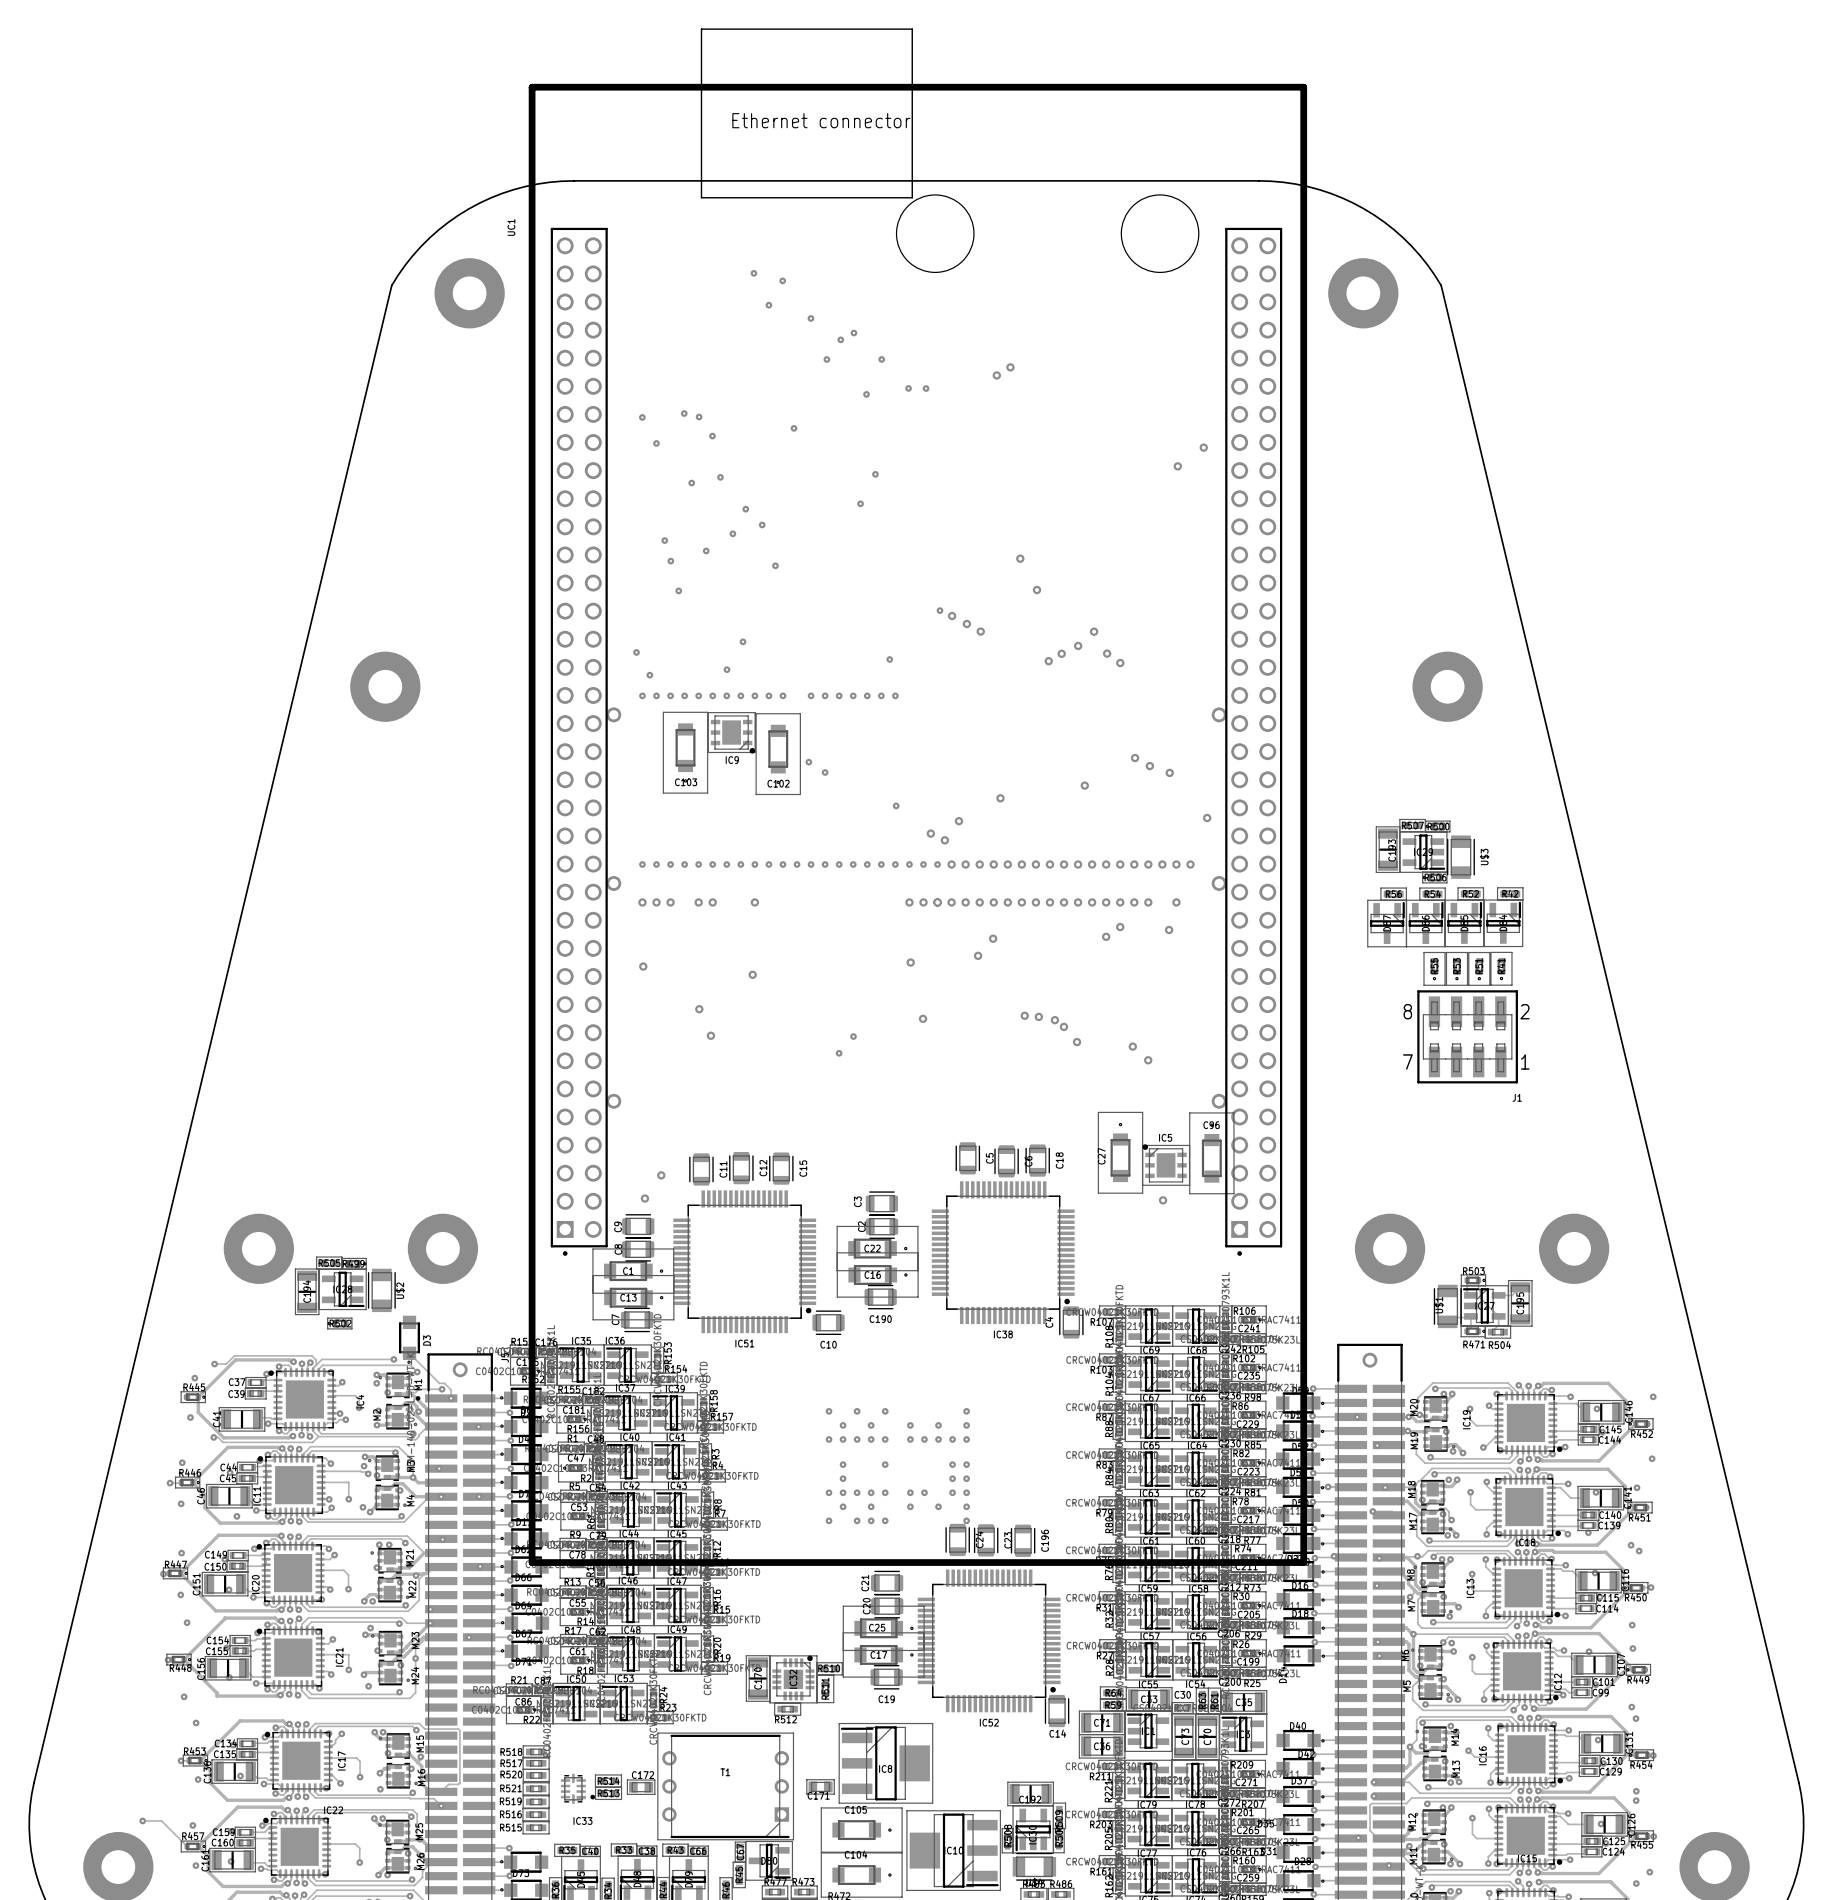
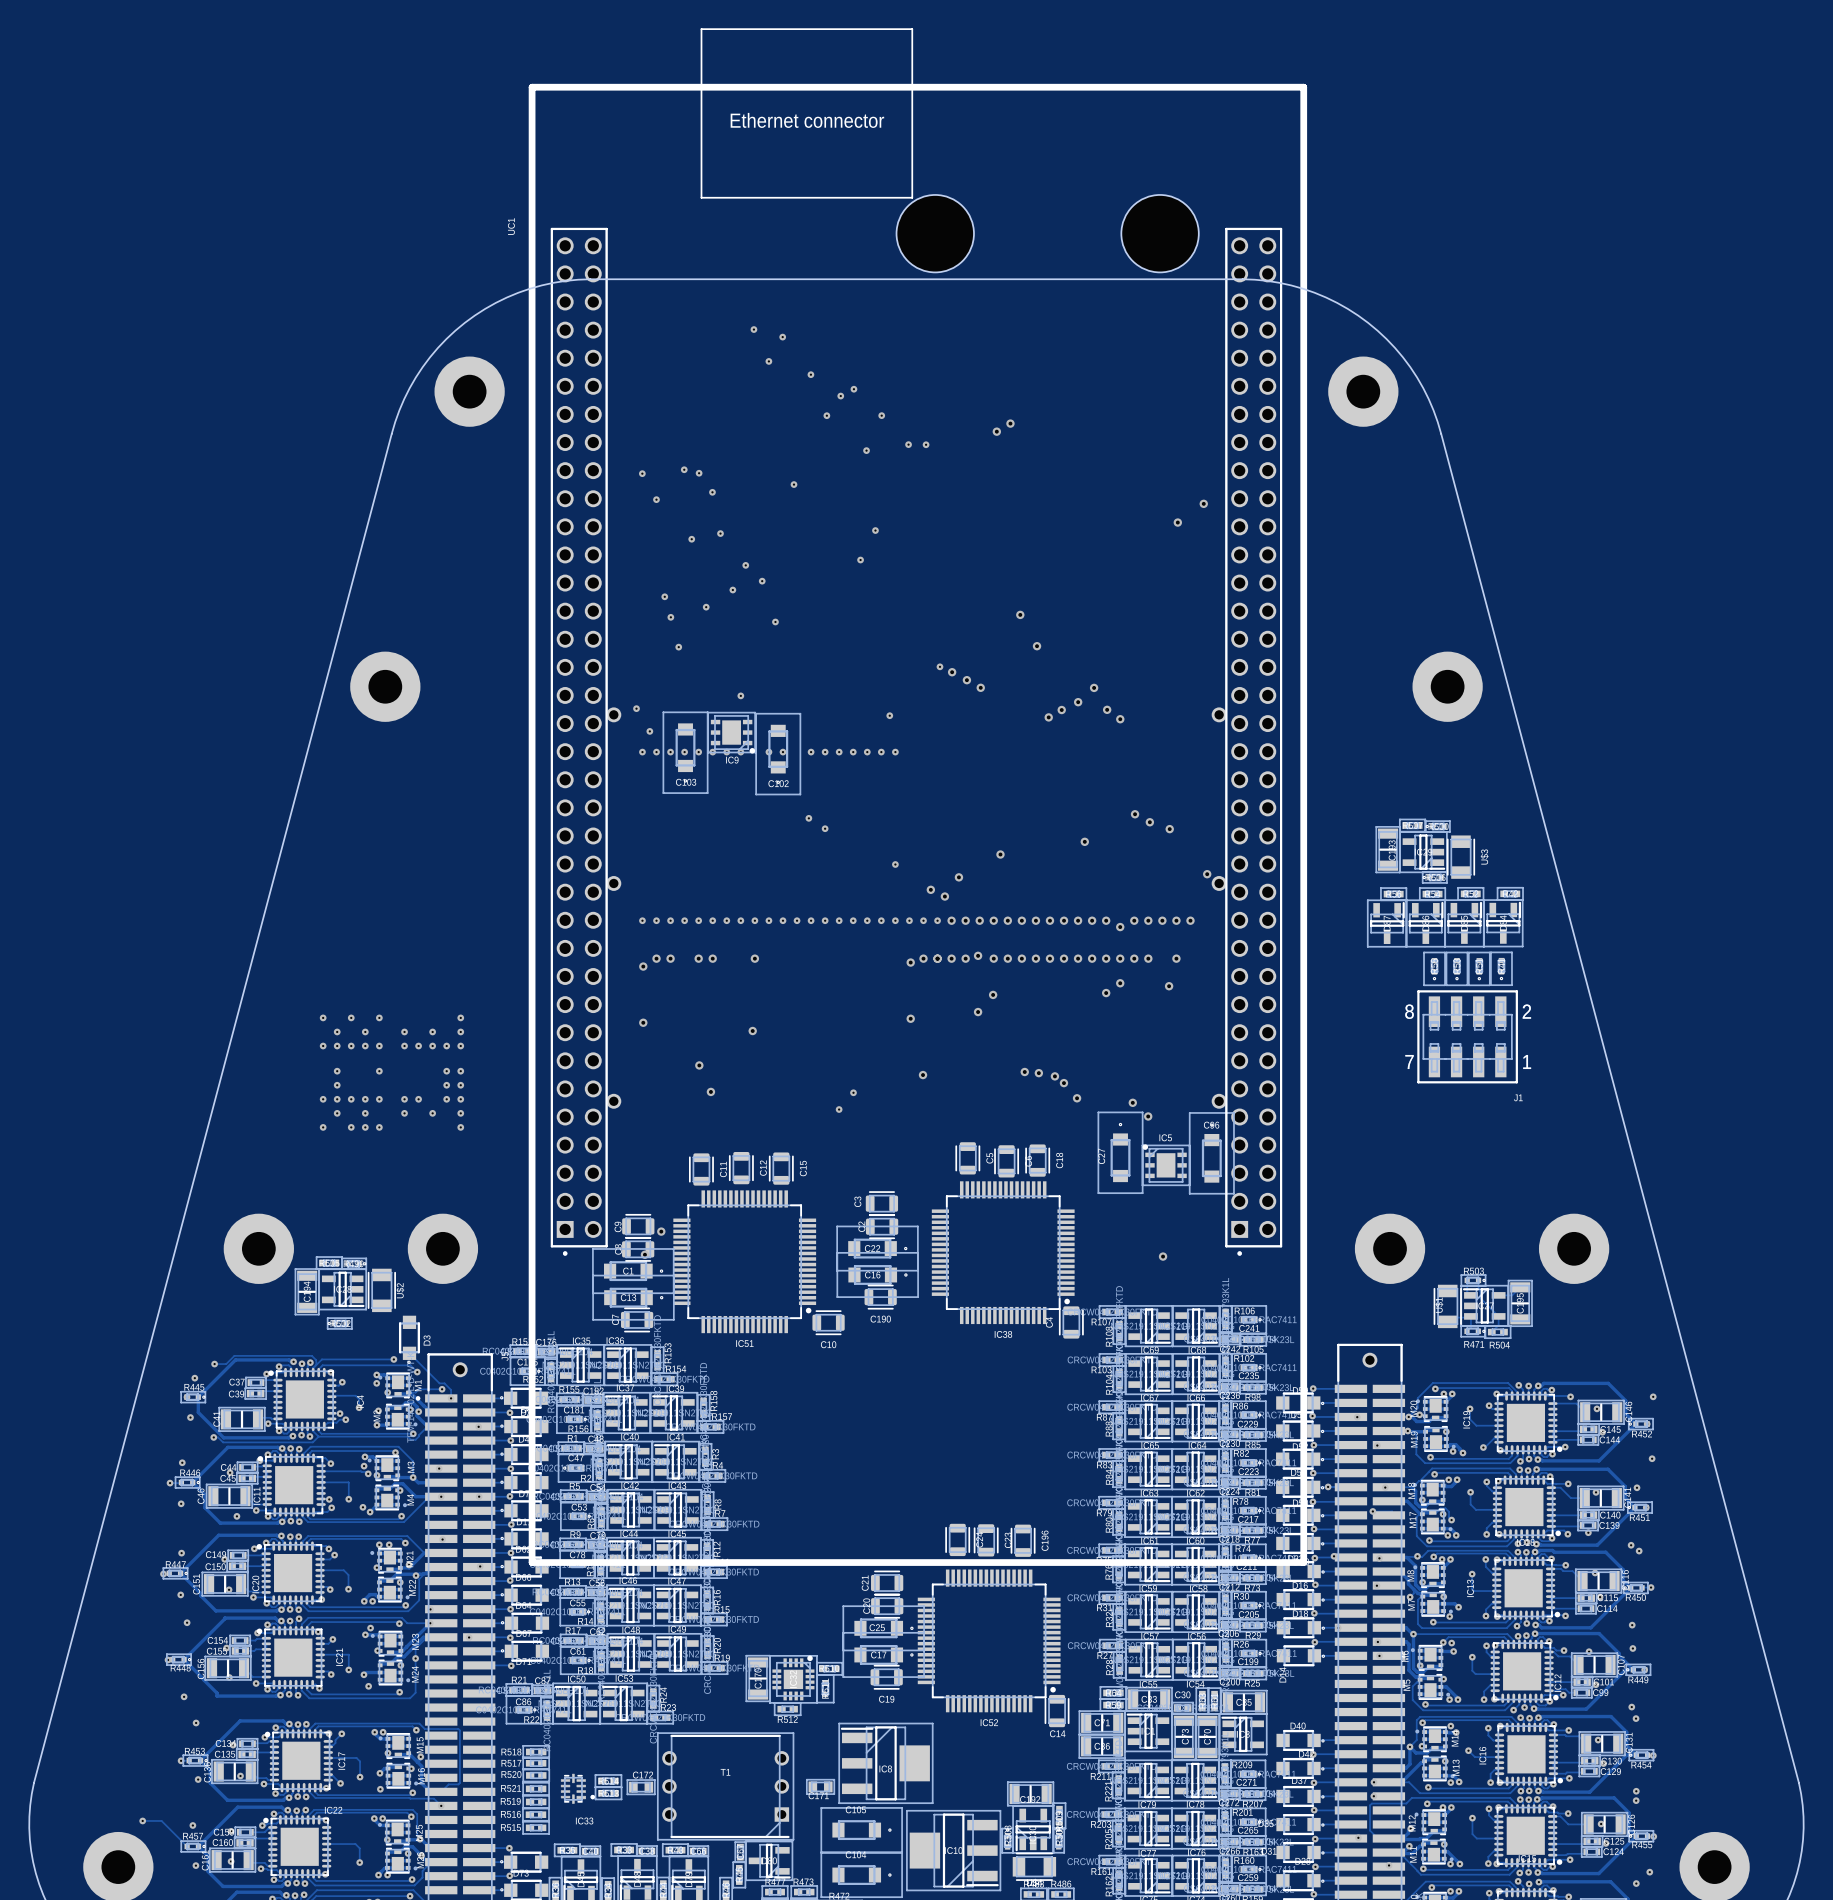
via: (753, 273) -> none
via: (782, 280) -> none
part position: (469, 293) -> (469, 391)
part position: (1363, 293) -> (1363, 391)
via: (768, 305) -> none
via: (810, 318) -> none
via: none -> (753, 329)
via: (853, 333) -> none
via: none -> (782, 337)
via: (840, 339) -> none
via: (826, 359) -> none
via: (881, 359) -> none
via: none -> (768, 361)
via: (1010, 367) -> none
via: none -> (810, 374)
via: (996, 375) -> none
via: (908, 388) -> none
via: (926, 388) -> none
via: none -> (853, 389)
via: (866, 394) -> none
via: none -> (840, 396)
via: (684, 413) -> none
via: none -> (826, 415)
via: none -> (881, 415)
via: (642, 417) -> none
via: (699, 417) -> none
via: none -> (1010, 423)
via: (794, 428) -> none
via: none -> (996, 431)
via: (712, 436) -> none
via: (656, 443) -> none
via: none -> (908, 444)
via: none -> (926, 444)
via: (1203, 447) -> none
via: none -> (866, 450)
via: (1177, 466) -> none
via: none -> (684, 469)
via: none -> (642, 473)
via: none -> (699, 473)
via: (875, 474) -> none
via: (720, 477) -> none
via: (691, 483) -> none
via: none -> (794, 484)
via: none -> (712, 492)
via: none -> (656, 499)
via: (860, 503) -> none
via: none -> (1203, 503)
via: (745, 509) -> none
via: none -> (1177, 522)
via: (762, 524) -> none
via: none -> (875, 530)
via: none -> (720, 533)
via: (732, 533) -> none
via: none -> (691, 539)
via: (664, 540) -> none
via: (706, 550) -> none
via: (1020, 558) -> none
via: none -> (860, 560)
via: (670, 561) -> none
via: none -> (745, 565)
via: (775, 565) -> none
via: none -> (762, 581)
via: (1037, 589) -> none
via: (678, 590) -> none
via: none -> (732, 590)
via: none -> (664, 596)
via: none -> (706, 607)
via: (939, 610) -> none
via: none -> (1020, 614)
via: (952, 616) -> none
via: none -> (670, 617)
via: none -> (775, 621)
via: (966, 623) -> none
via: (980, 631) -> none
via: (1094, 631) -> none
via: (742, 641) -> none
via: (1078, 645) -> none
via: none -> (1037, 646)
via: none -> (678, 647)
via: (636, 652) -> none
via: (1061, 653) -> none
via: (1107, 653) -> none
via: (889, 659) -> none
via: (1048, 661) -> none
via: (1120, 663) -> none
via: none -> (939, 666)
via: (726, 669) -> none
via: none -> (952, 672)
via: (649, 675) -> none
via: none -> (966, 680)
via: none -> (980, 687)
via: none -> (1094, 687)
via: (642, 695) -> none
via: (656, 695) -> none
via: (670, 695) -> none
via: (684, 695) -> none
via: (698, 695) -> none
via: (712, 695) -> none
via: (726, 695) -> none
via: (754, 695) -> none
via: (768, 695) -> none
via: (782, 695) -> none
via: (811, 695) -> none
via: (825, 695) -> none
via: (839, 695) -> none
via: (853, 695) -> none
via: (867, 695) -> none
via: (881, 695) -> none
via: (895, 695) -> none
via: none -> (1078, 702)
via: none -> (636, 708)
via: none -> (1107, 709)
via: none -> (1061, 710)
via: none -> (889, 715)
via: none -> (1048, 717)
via: none -> (1120, 719)
via: none -> (649, 731)
via: none -> (642, 752)
via: none -> (656, 752)
via: none -> (670, 752)
via: none -> (684, 752)
via: none -> (698, 752)
via: none -> (712, 752)
via: none -> (726, 752)
via: none -> (740, 752)
via: none -> (768, 752)
via: none -> (782, 752)
via: none -> (811, 752)
via: none -> (825, 752)
via: none -> (839, 752)
via: none -> (853, 752)
via: none -> (867, 752)
via: none -> (881, 752)
via: none -> (895, 752)
via: (1135, 758) -> none
via: (808, 762) -> none
via: (1149, 766) -> none
via: (825, 772) -> none
via: (1169, 772) -> none
via: (1084, 785) -> none
via: (1000, 798) -> none
via: (896, 805) -> none
via: none -> (1135, 814)
via: (1207, 817) -> none
via: none -> (808, 818)
via: (958, 821) -> none
via: none -> (1149, 822)
via: none -> (825, 828)
via: none -> (1169, 829)
via: (930, 833) -> none
via: (944, 840) -> none
via: none -> (1084, 841)
via: none -> (1000, 854)
via: (642, 864) -> none
via: (656, 864) -> none
via: (670, 864) -> none
via: (684, 864) -> none
via: (698, 864) -> none
via: (712, 864) -> none
via: (726, 864) -> none
via: (740, 864) -> none
via: (754, 864) -> none
via: (768, 864) -> none
via: (782, 864) -> none
via: (797, 864) -> none
via: (811, 864) -> none
via: (825, 864) -> none
via: (839, 864) -> none
via: (853, 864) -> none
via: (867, 864) -> none
via: (881, 864) -> none
via: (909, 864) -> none
via: (923, 864) -> none
via: (937, 864) -> none
via: (951, 864) -> none
via: (965, 864) -> none
via: (979, 864) -> none
via: (993, 864) -> none
via: (1007, 864) -> none
via: (1021, 864) -> none
via: (1035, 864) -> none
via: (1049, 864) -> none
via: (1064, 864) -> none
via: (1078, 864) -> none
via: (1092, 864) -> none
via: (1106, 864) -> none
via: (1120, 864) -> none
via: (1134, 864) -> none
via: (1148, 864) -> none
via: (1162, 864) -> none
via: (1176, 864) -> none
via: (1190, 864) -> none
via: none -> (1207, 874)
via: none -> (958, 877)
via: none -> (930, 889)
via: none -> (944, 896)
via: (642, 902) -> none
via: (656, 902) -> none
via: (670, 902) -> none
via: (698, 902) -> none
via: (712, 902) -> none
via: (754, 902) -> none
via: (909, 902) -> none
via: (923, 902) -> none
via: (937, 902) -> none
via: (951, 902) -> none
via: (965, 902) -> none
via: (979, 902) -> none
via: (993, 902) -> none
via: (1007, 902) -> none
via: (1021, 902) -> none
via: (1035, 902) -> none
via: (1049, 902) -> none
via: (1064, 902) -> none
via: (1078, 902) -> none
via: (1092, 902) -> none
via: (1106, 902) -> none
via: (1120, 902) -> none
via: (1134, 902) -> none
via: (1148, 902) -> none
via: (1176, 902) -> none
via: none -> (642, 920)
via: none -> (656, 920)
via: none -> (670, 920)
via: none -> (684, 920)
via: none -> (698, 920)
via: none -> (712, 920)
via: none -> (726, 920)
via: none -> (740, 920)
via: none -> (754, 920)
via: none -> (768, 920)
via: none -> (782, 920)
via: none -> (797, 920)
via: none -> (811, 920)
via: none -> (825, 920)
via: none -> (839, 920)
via: none -> (853, 920)
via: none -> (867, 920)
via: none -> (881, 920)
via: none -> (895, 920)
via: none -> (909, 920)
via: none -> (923, 920)
via: none -> (937, 920)
via: none -> (951, 920)
via: none -> (965, 920)
via: none -> (979, 920)
via: none -> (993, 920)
via: none -> (1007, 920)
via: none -> (1021, 920)
via: none -> (1035, 920)
via: none -> (1049, 920)
via: none -> (1064, 920)
via: none -> (1078, 920)
via: none -> (1092, 920)
via: none -> (1106, 920)
via: none -> (1134, 920)
via: none -> (1148, 920)
via: none -> (1162, 920)
via: none -> (1176, 920)
via: none -> (1190, 920)
via: (1169, 930) -> none
via: (1106, 936) -> none
via: (993, 938) -> none
via: none -> (656, 958)
via: none -> (670, 958)
via: none -> (698, 958)
via: none -> (712, 958)
via: none -> (923, 958)
via: none -> (937, 958)
via: none -> (951, 958)
via: none -> (965, 958)
via: none -> (993, 958)
via: none -> (1007, 958)
via: none -> (1021, 958)
via: none -> (1035, 958)
via: none -> (1049, 958)
via: none -> (1064, 958)
via: none -> (1078, 958)
via: none -> (1092, 958)
via: none -> (1106, 958)
via: none -> (1120, 958)
via: none -> (1134, 958)
via: none -> (1148, 958)
via: none -> (1176, 958)
via position: (752, 974) -> (754, 958)
via: none -> (1120, 983)
via: none -> (1169, 986)
via: none -> (1106, 993)
via: none -> (993, 994)
via: (699, 1009) -> none
via: none -> (978, 1012)
via: (1024, 1015) -> none
via: (1038, 1016) -> none
via: none -> (323, 1017)
via: none -> (351, 1017)
via: none -> (379, 1017)
via: none -> (460, 1017)
via position: (923, 1018) -> (910, 1018)
via: (1054, 1020) -> none
via: none -> (643, 1022)
via: (1063, 1026) -> none
via: none -> (337, 1031)
via: none -> (365, 1031)
via: none -> (404, 1031)
via: none -> (432, 1031)
via: none -> (460, 1031)
via: none -> (752, 1031)
via: (710, 1035) -> none
via: (853, 1036) -> none
via: (1077, 1042) -> none
via: none -> (323, 1046)
via: none -> (337, 1046)
via: none -> (351, 1046)
via: none -> (365, 1046)
via: none -> (379, 1046)
via: none -> (404, 1046)
via: none -> (418, 1046)
via: none -> (432, 1046)
via: none -> (446, 1046)
via: none -> (460, 1046)
via: (1132, 1046) -> none
via: (839, 1053) -> none
via: (1148, 1060) -> none
via: none -> (699, 1065)
via: none -> (337, 1071)
via: none -> (379, 1071)
via: none -> (446, 1071)
via: none -> (460, 1071)
via: none -> (1024, 1072)
via: none -> (1038, 1073)
via: none -> (923, 1075)
via: none -> (1054, 1076)
via: none -> (1063, 1083)
via: none -> (337, 1085)
via: none -> (446, 1085)
via: none -> (460, 1085)
via: none -> (710, 1091)
via: none -> (853, 1092)
via: none -> (1077, 1098)
via: none -> (323, 1099)
via: none -> (337, 1099)
via: none -> (351, 1099)
via: none -> (365, 1099)
via: none -> (379, 1099)
via: none -> (404, 1099)
via: none -> (418, 1099)
via: none -> (446, 1099)
via: none -> (460, 1099)
via: none -> (1132, 1102)
via: none -> (839, 1109)
via: none -> (337, 1113)
via: none -> (365, 1113)
via: none -> (404, 1113)
via: none -> (432, 1113)
via: none -> (460, 1113)
via: none -> (1148, 1116)
via: none -> (323, 1127)
via: none -> (351, 1127)
via: none -> (365, 1127)
via: none -> (379, 1127)
via: none -> (460, 1127)
via: (661, 1175) -> none
via: (644, 1198) -> none
via: (1163, 1200) -> none
via: none -> (661, 1231)
via: none -> (644, 1254)
via: none -> (1163, 1256)
via: (829, 1411) -> none
via: (857, 1411) -> none
via: (885, 1411) -> none
via: (966, 1411) -> none
via: (843, 1425) -> none
via: (871, 1425) -> none
via: (910, 1425) -> none
via: (938, 1425) -> none
via: (966, 1425) -> none
via: (829, 1439) -> none
via: (843, 1439) -> none
via: (857, 1439) -> none
via: (871, 1439) -> none
via: (885, 1439) -> none
via: (910, 1439) -> none
via: (924, 1439) -> none
via: (938, 1439) -> none
via: (952, 1439) -> none
via: (966, 1439) -> none
via: (843, 1464) -> none
via: (885, 1464) -> none
via: (952, 1464) -> none
via: (966, 1464) -> none
via: (843, 1478) -> none
via: (952, 1478) -> none
via: (966, 1478) -> none
via: (829, 1492) -> none
via: (843, 1492) -> none
via: (857, 1492) -> none
via: (871, 1492) -> none
via: (885, 1492) -> none
via: (910, 1492) -> none
via: (924, 1492) -> none
via: (952, 1492) -> none
via: (966, 1492) -> none
via: (843, 1506) -> none
via: (871, 1506) -> none
via: (910, 1506) -> none
via: (938, 1506) -> none
via: (966, 1506) -> none
via: (829, 1520) -> none
via: (857, 1520) -> none
via: (871, 1520) -> none
via: (885, 1520) -> none
via: (966, 1520) -> none
board edge: (34, 1782) (391, 285) (421, 246) (448, 222) (468, 208) (490, 197) (525, 186) (573, 180) (1283, 182) (1319, 189) (1364, 208) (1403, 237) (1427, 265) (1441, 285) (1798, 1782) -> (34, 1782) (399, 410) (409, 388) (429, 357) (455, 330) (474, 315) (495, 302) (529, 288) (553, 282) (590, 279) (1254, 279) (1303, 288) (1337, 302) (1368, 322) (1402, 357) (1423, 388) (1441, 433) (1798, 1782)

